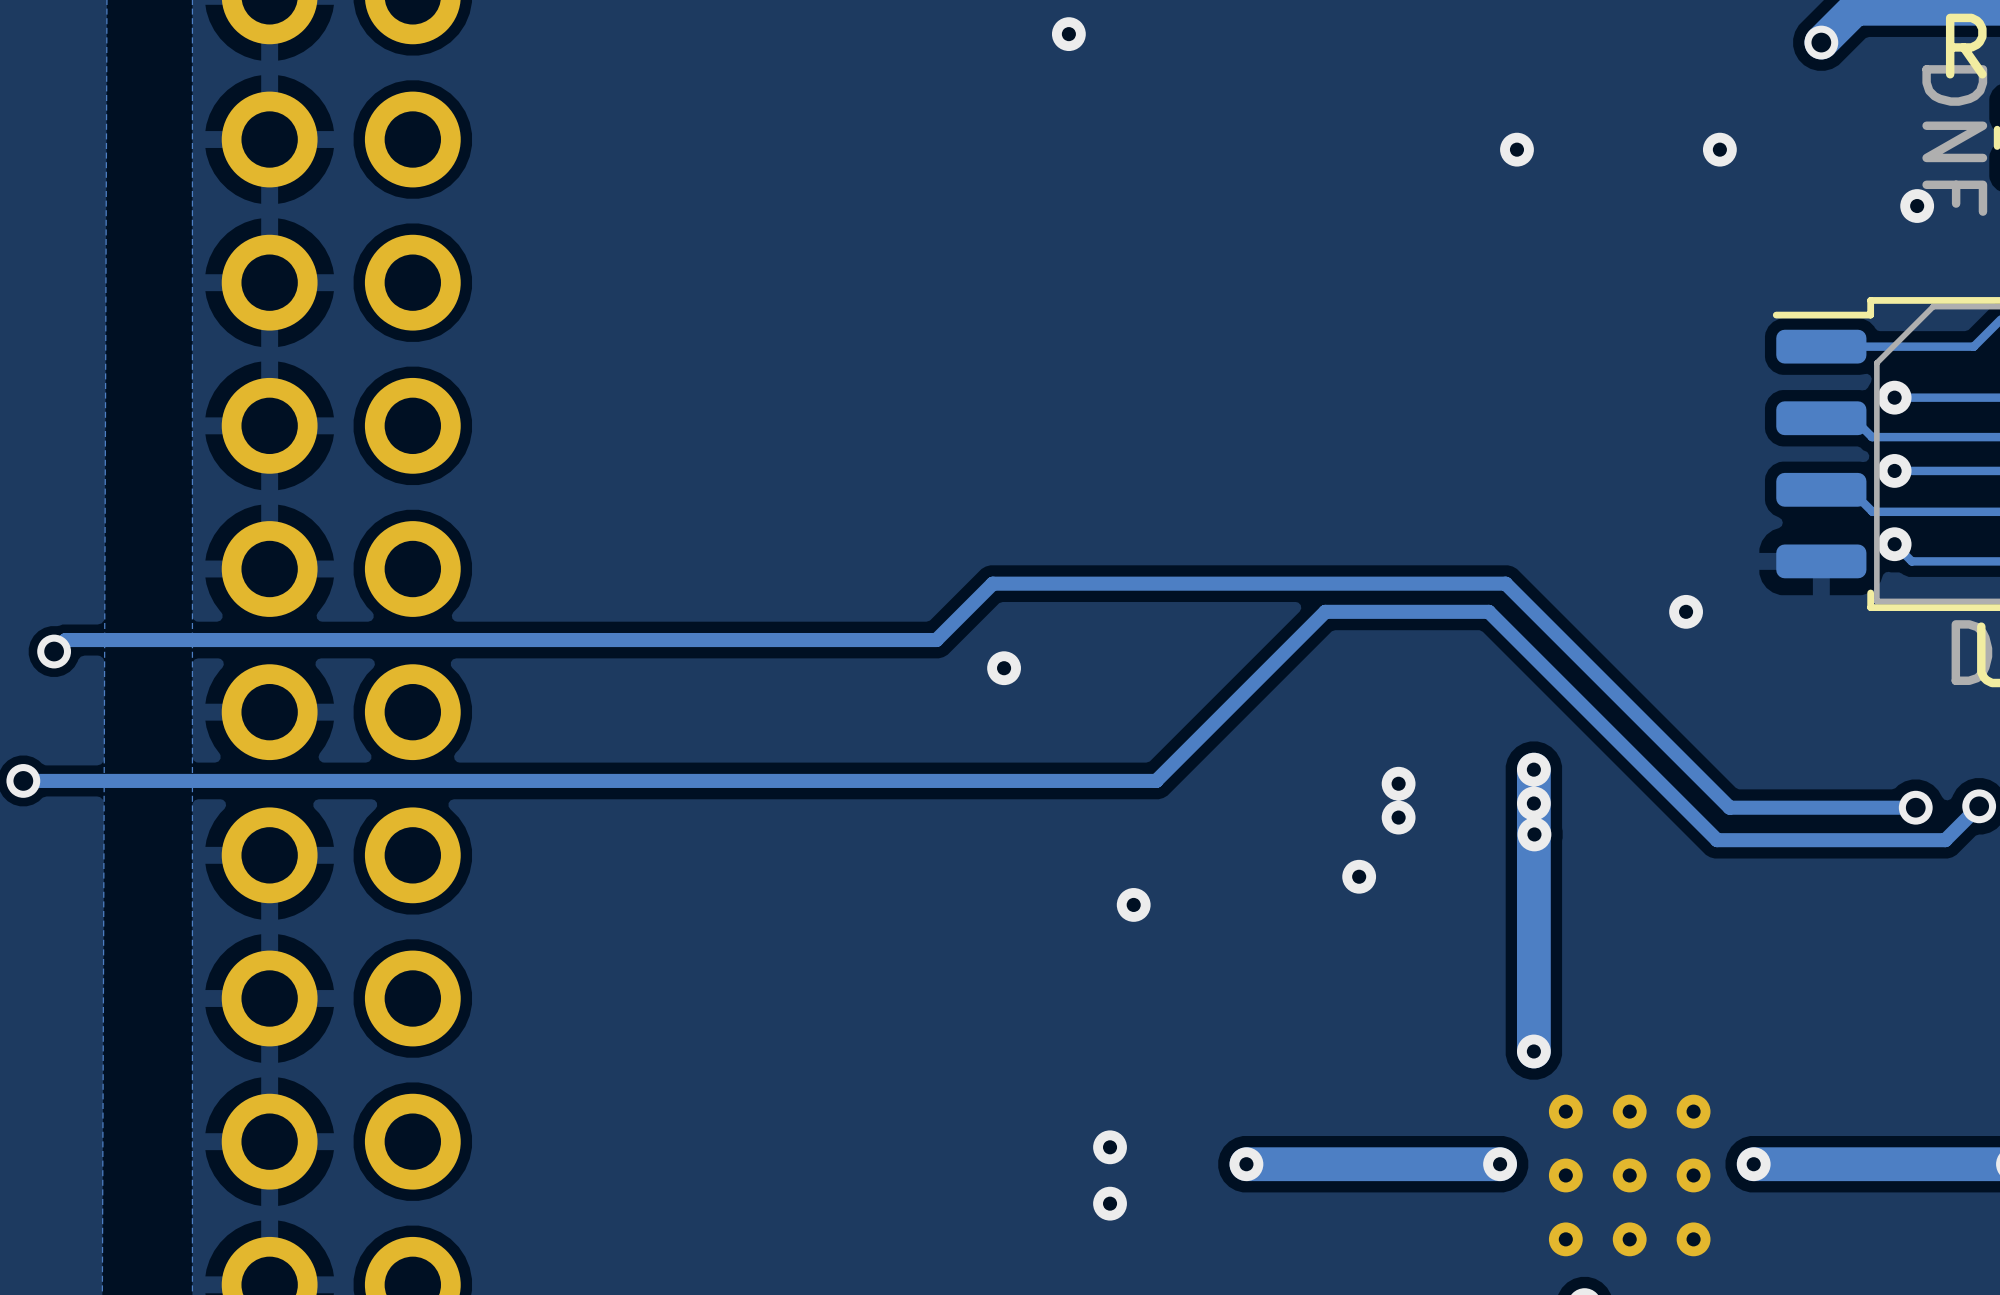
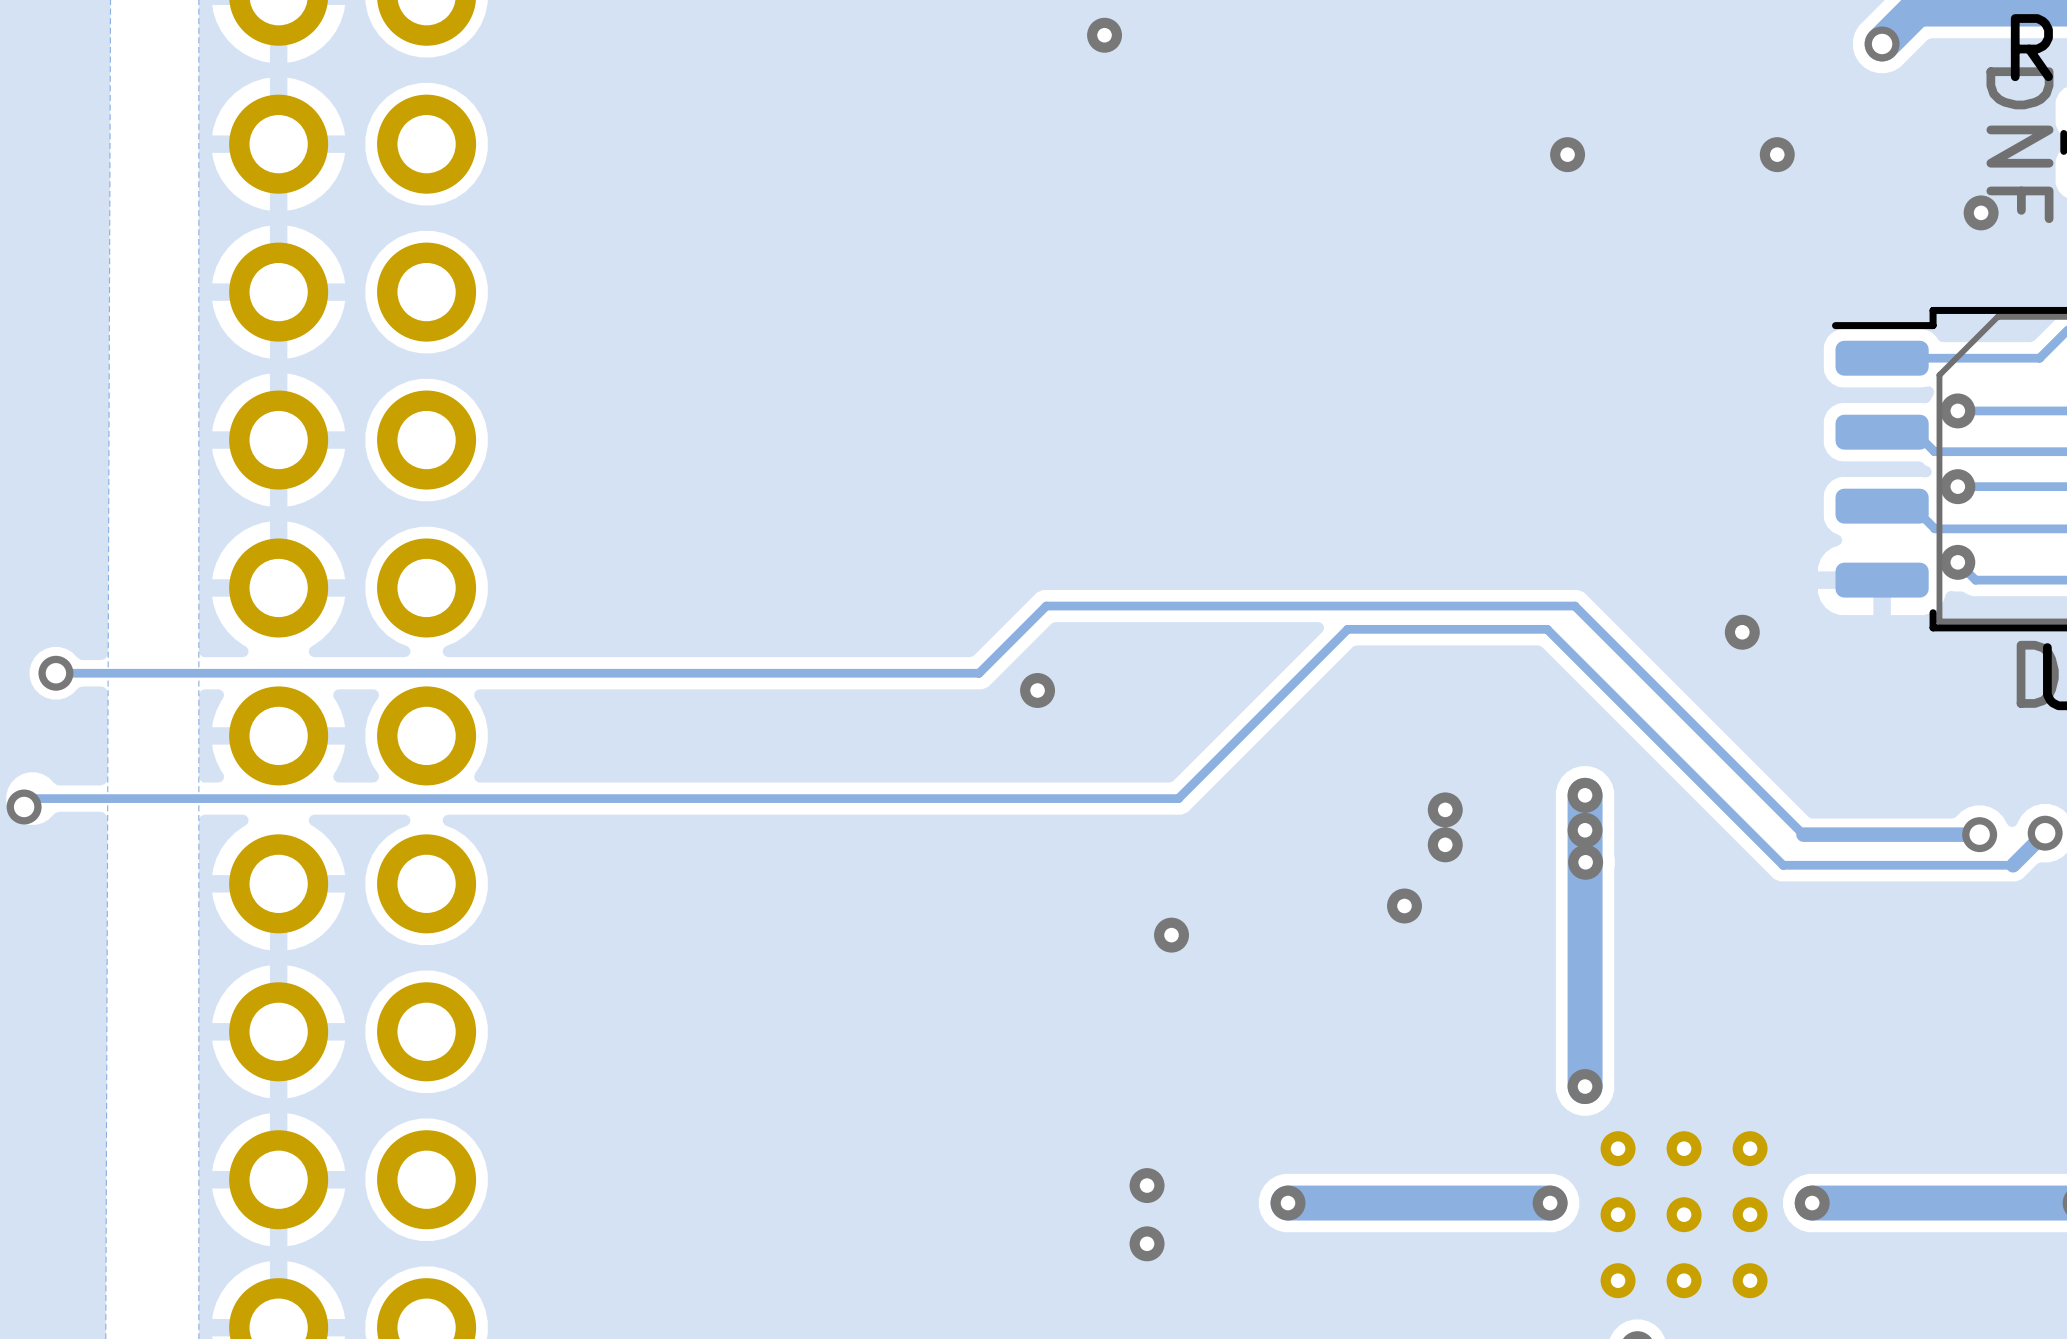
track: (54, 651) (65, 640) (936, 640) (992, 583) (1505, 583) (1729, 807) (1745, 807) -> (55, 673) (979, 673) (1046, 606) (1574, 606) (1803, 834)
track: (23, 780) (1156, 780) (1325, 611) (1488, 611) (1717, 840) (1945, 840) (1948, 837) -> (32, 798) (1178, 798) (1347, 629) (1547, 629) (1783, 865) (2013, 865)

